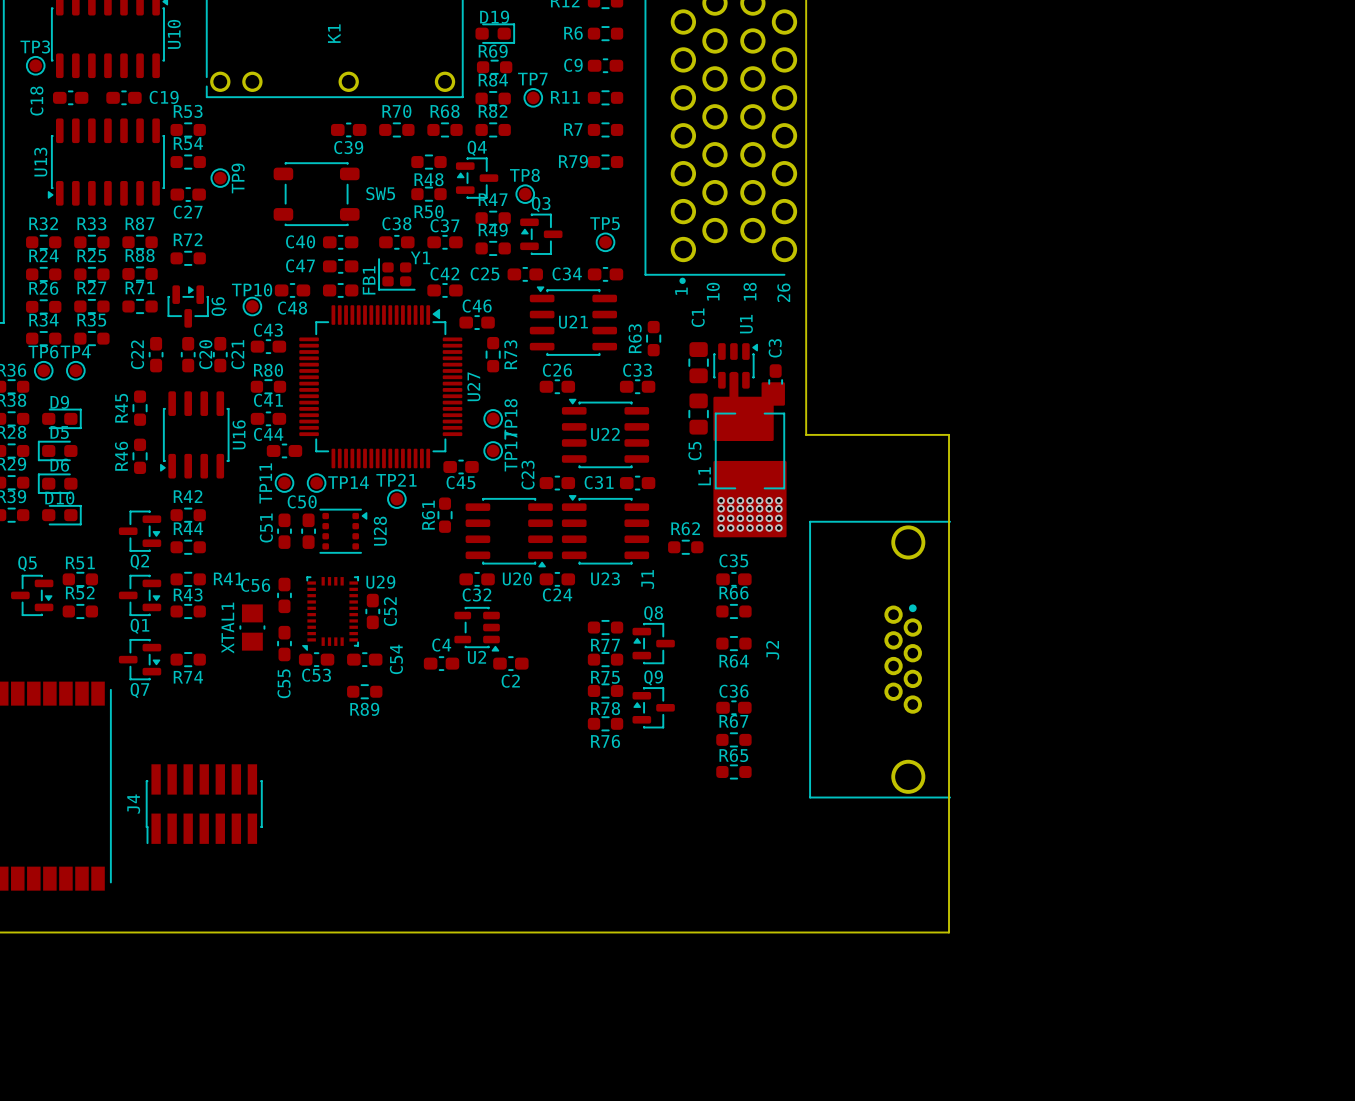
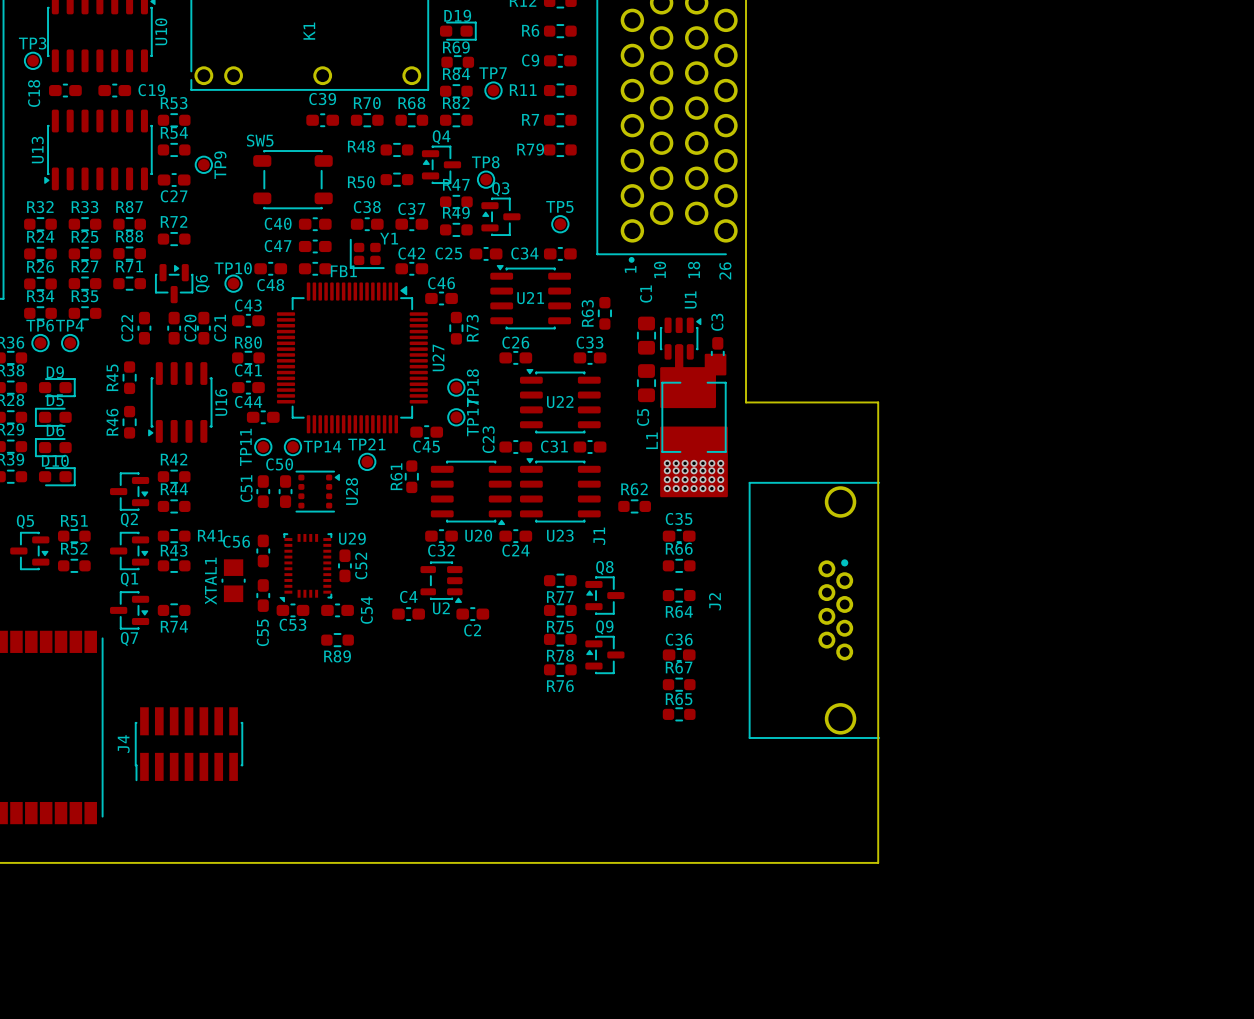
C39 name position: C39 (348, 147) -> C39 (322, 99)
R48 name position: R48 (429, 179) -> R48 (361, 146)
SW5 name position: SW5 (380, 193) -> SW5 (260, 140)
R50 name position: R50 (429, 211) -> R50 (361, 182)
FB1 name rotation: 0° (369, 280) -> 90° clockwise (343, 271)

